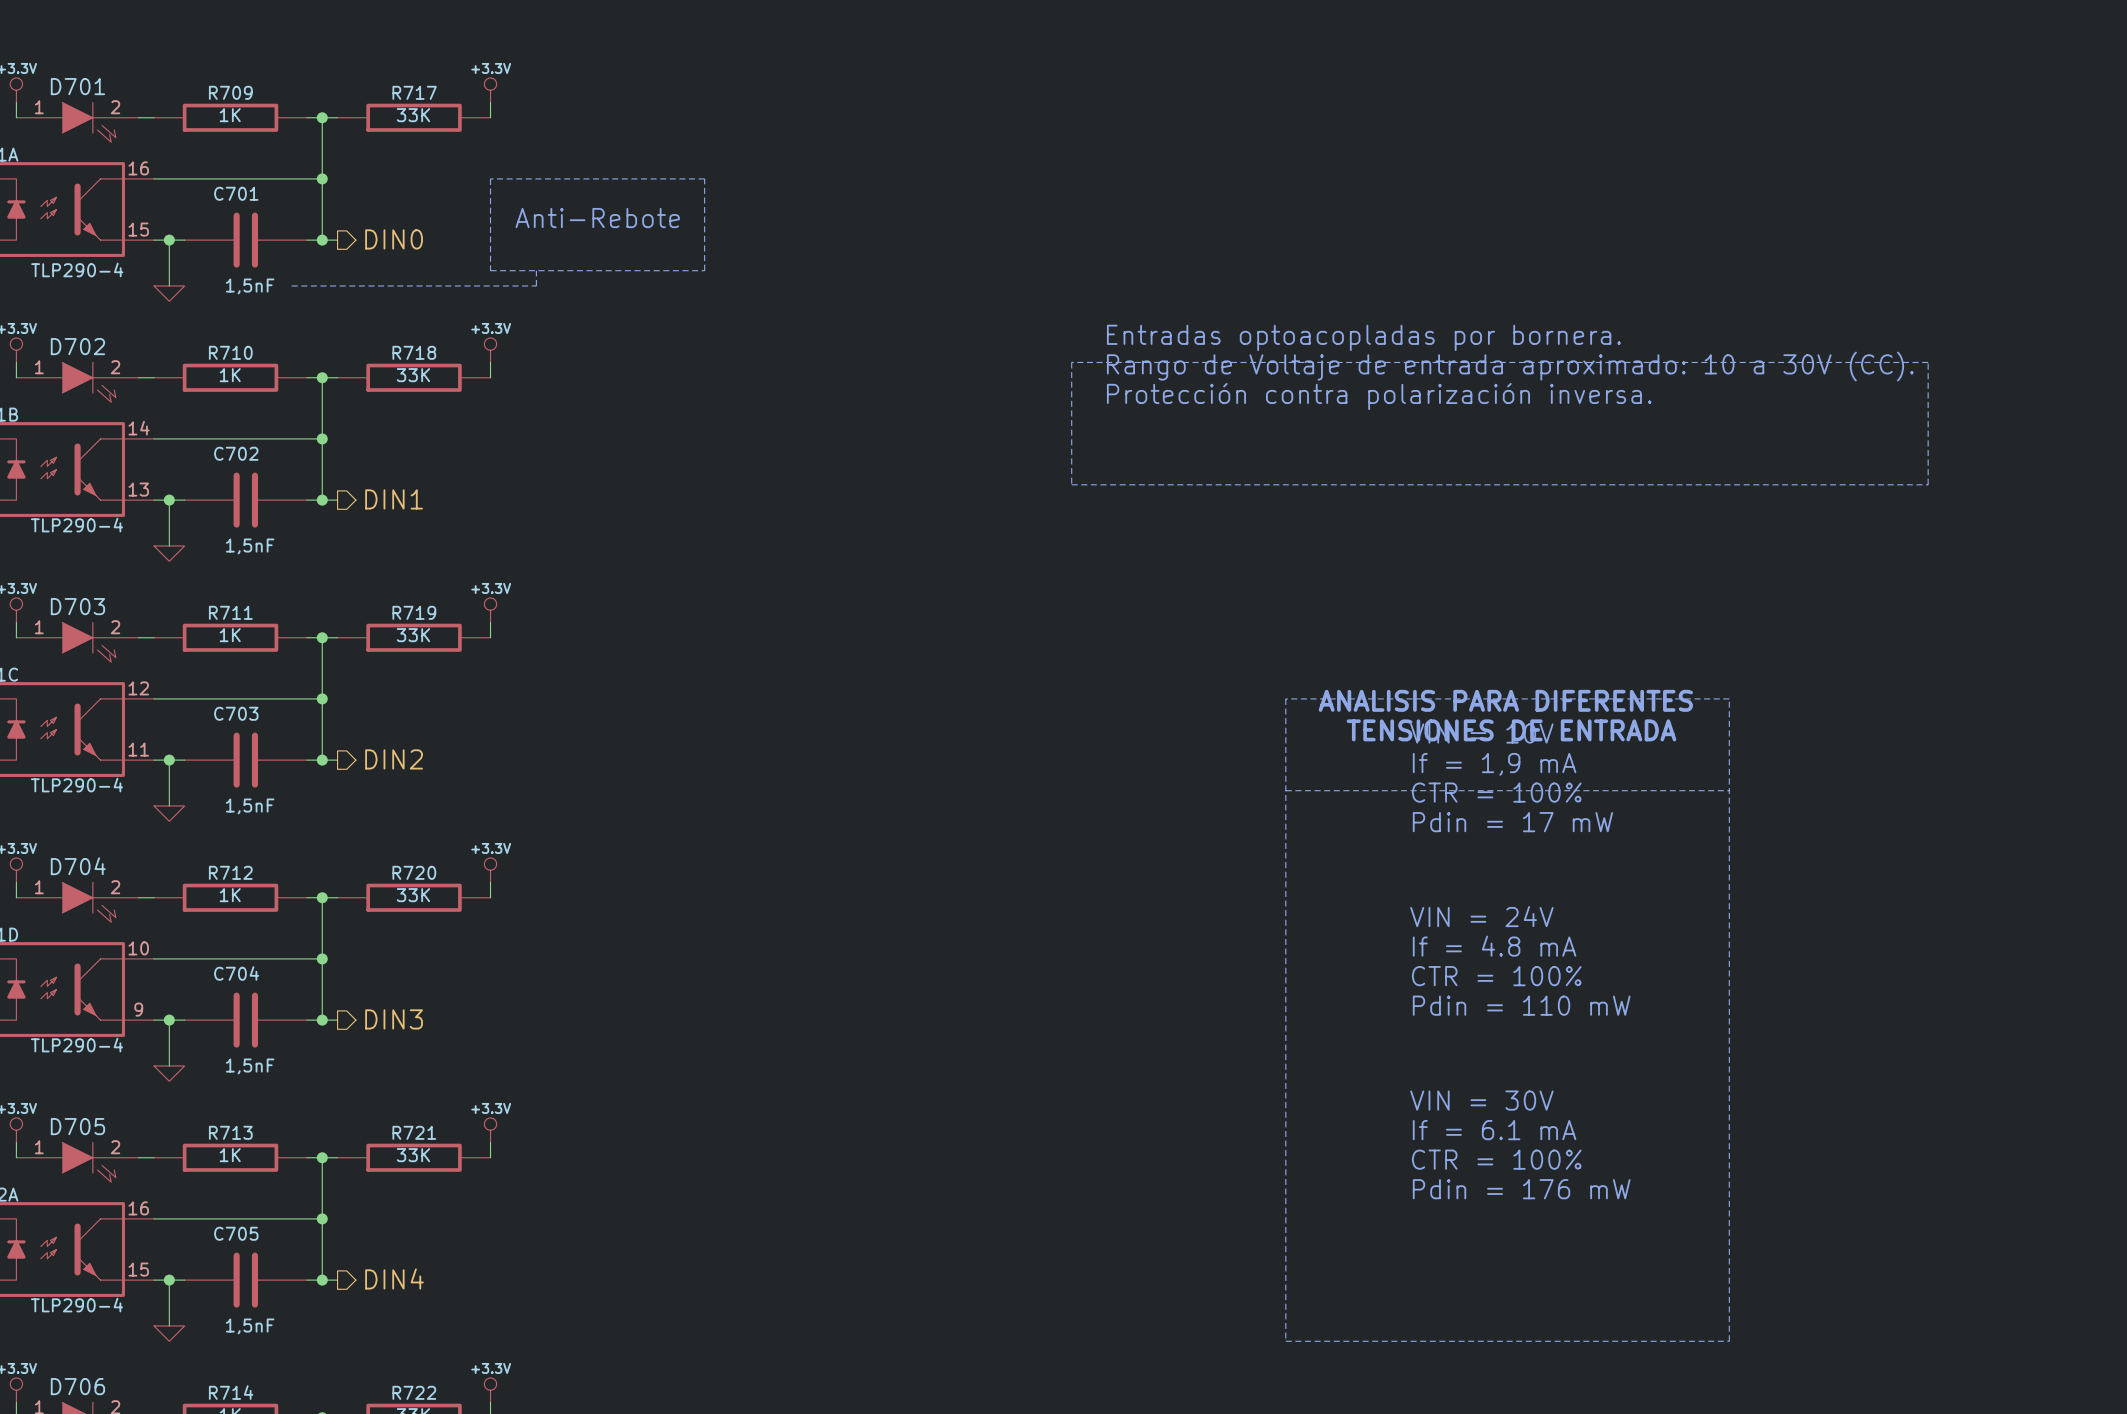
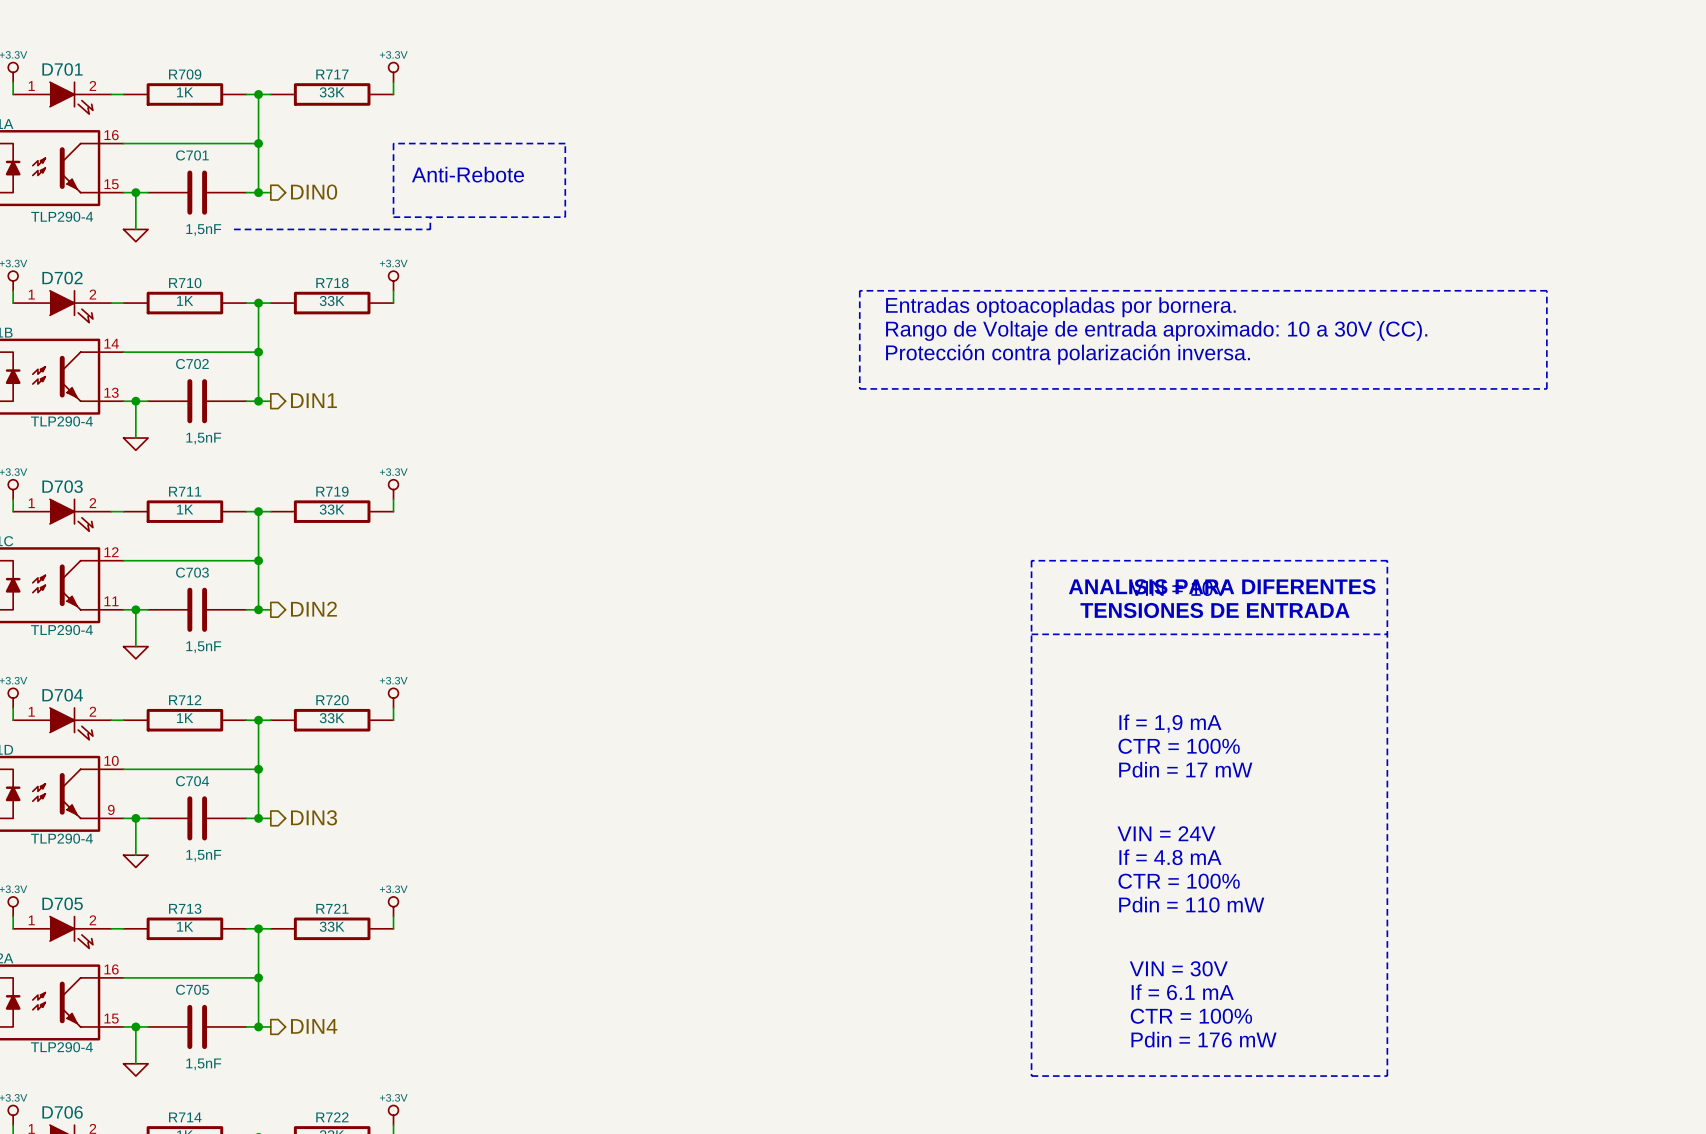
text position: Entradas optoacopladas por bornera. (1363, 337) -> Entradas optoacopladas por bornera. (1060, 307)
text position: Rango de Voltaje de entrada aproximado: 10 a 30V (CC). (1510, 366) -> Rango de Voltaje de entrada aproximado: 10 a 30V (CC). (1156, 330)
text position: Protección contra polarización inversa. (1379, 396) -> Protección contra polarización inversa. (1068, 354)
text position: ANALISIS PARA DIFERENTES (1505, 700) -> ANALISIS PARA DIFERENTES (1222, 586)
text position: TENSIONES DE ENTRADA (1511, 730) -> TENSIONES DE ENTRADA (1215, 610)
text position: If = 1,9 mA (1494, 764) -> If = 1,9 mA (1170, 723)
text: CTR = 100% (1496, 792) -> none
text position: Pdin = 17 mW (1512, 822) -> Pdin = 17 mW (1185, 769)
text position: VIN = 24V (1481, 916) -> VIN = 24V (1166, 833)
text position: If = 4.8 mA (1494, 946) -> If = 4.8 mA (1170, 857)
text position: CTR = 100% (1496, 976) -> CTR = 100% (1179, 746)
text position: Pdin = 110 mW (1521, 1005) -> Pdin = 110 mW (1191, 904)
text: none -> CTR = 100% (1179, 881)
text position: VIN = 30V (1481, 1100) -> VIN = 30V (1178, 968)
text position: If = 6.1 mA (1494, 1130) -> If = 6.1 mA (1182, 992)
text: CTR = 100% (1496, 1159) -> none
text position: Pdin = 176 mW (1521, 1189) -> Pdin = 176 mW (1204, 1039)
text: none -> CTR = 100% (1191, 1016)

